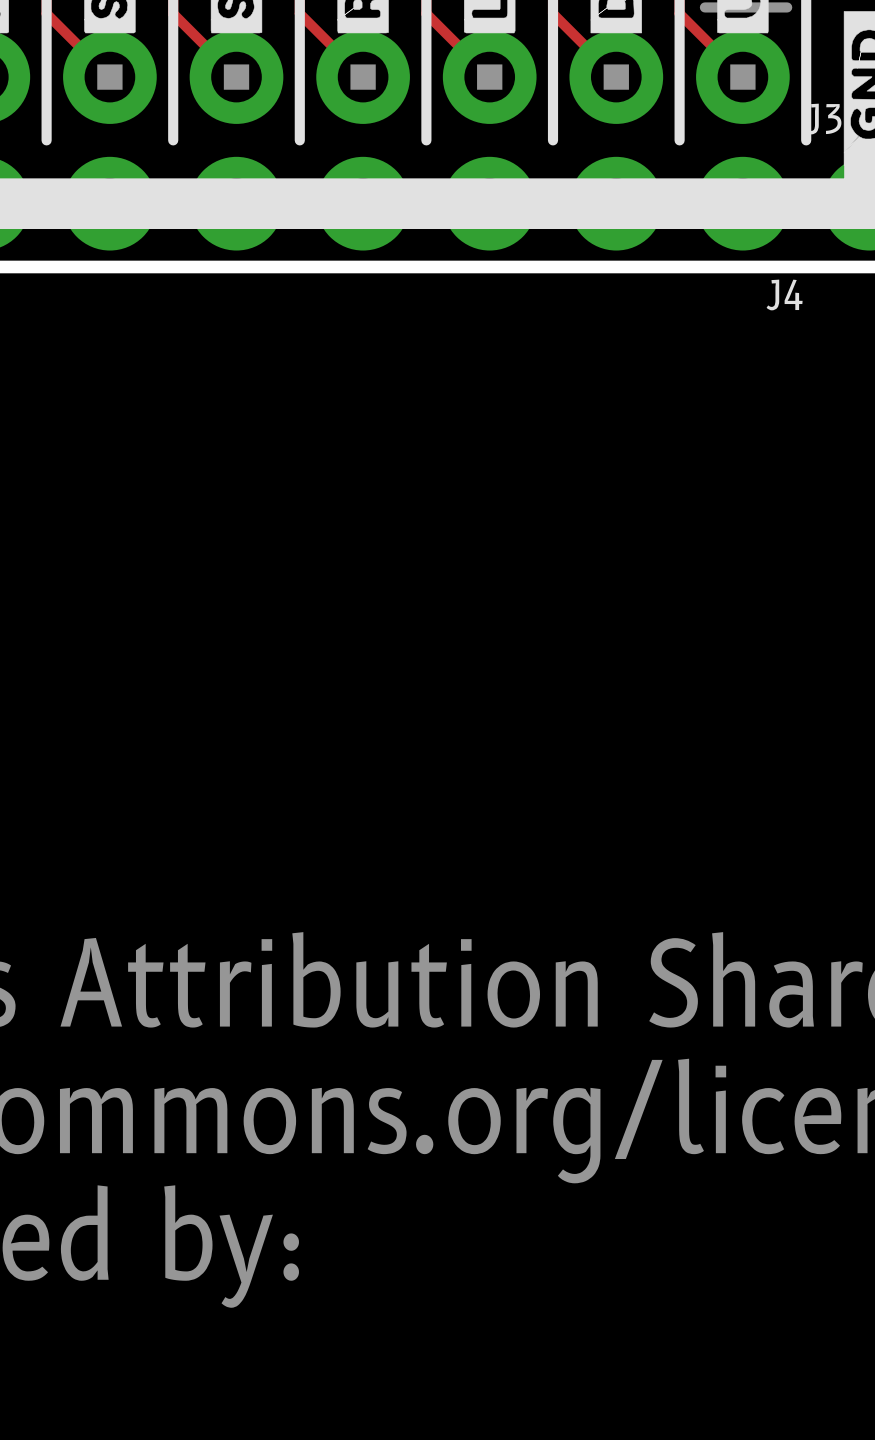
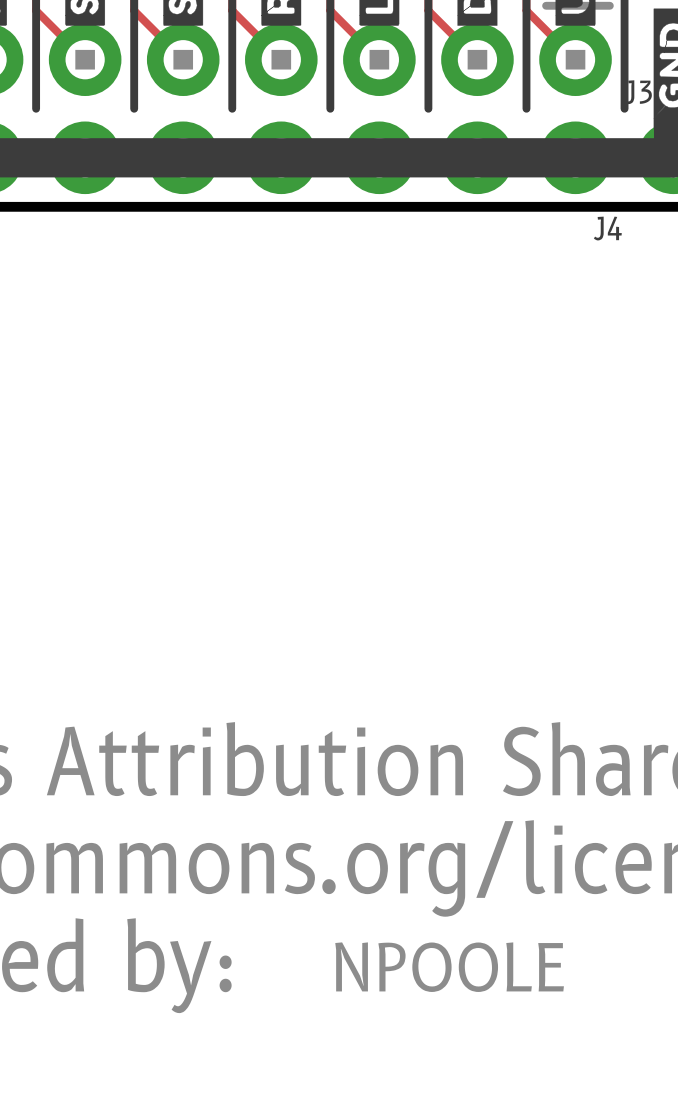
text: none -> NPOOLE (449, 967)

